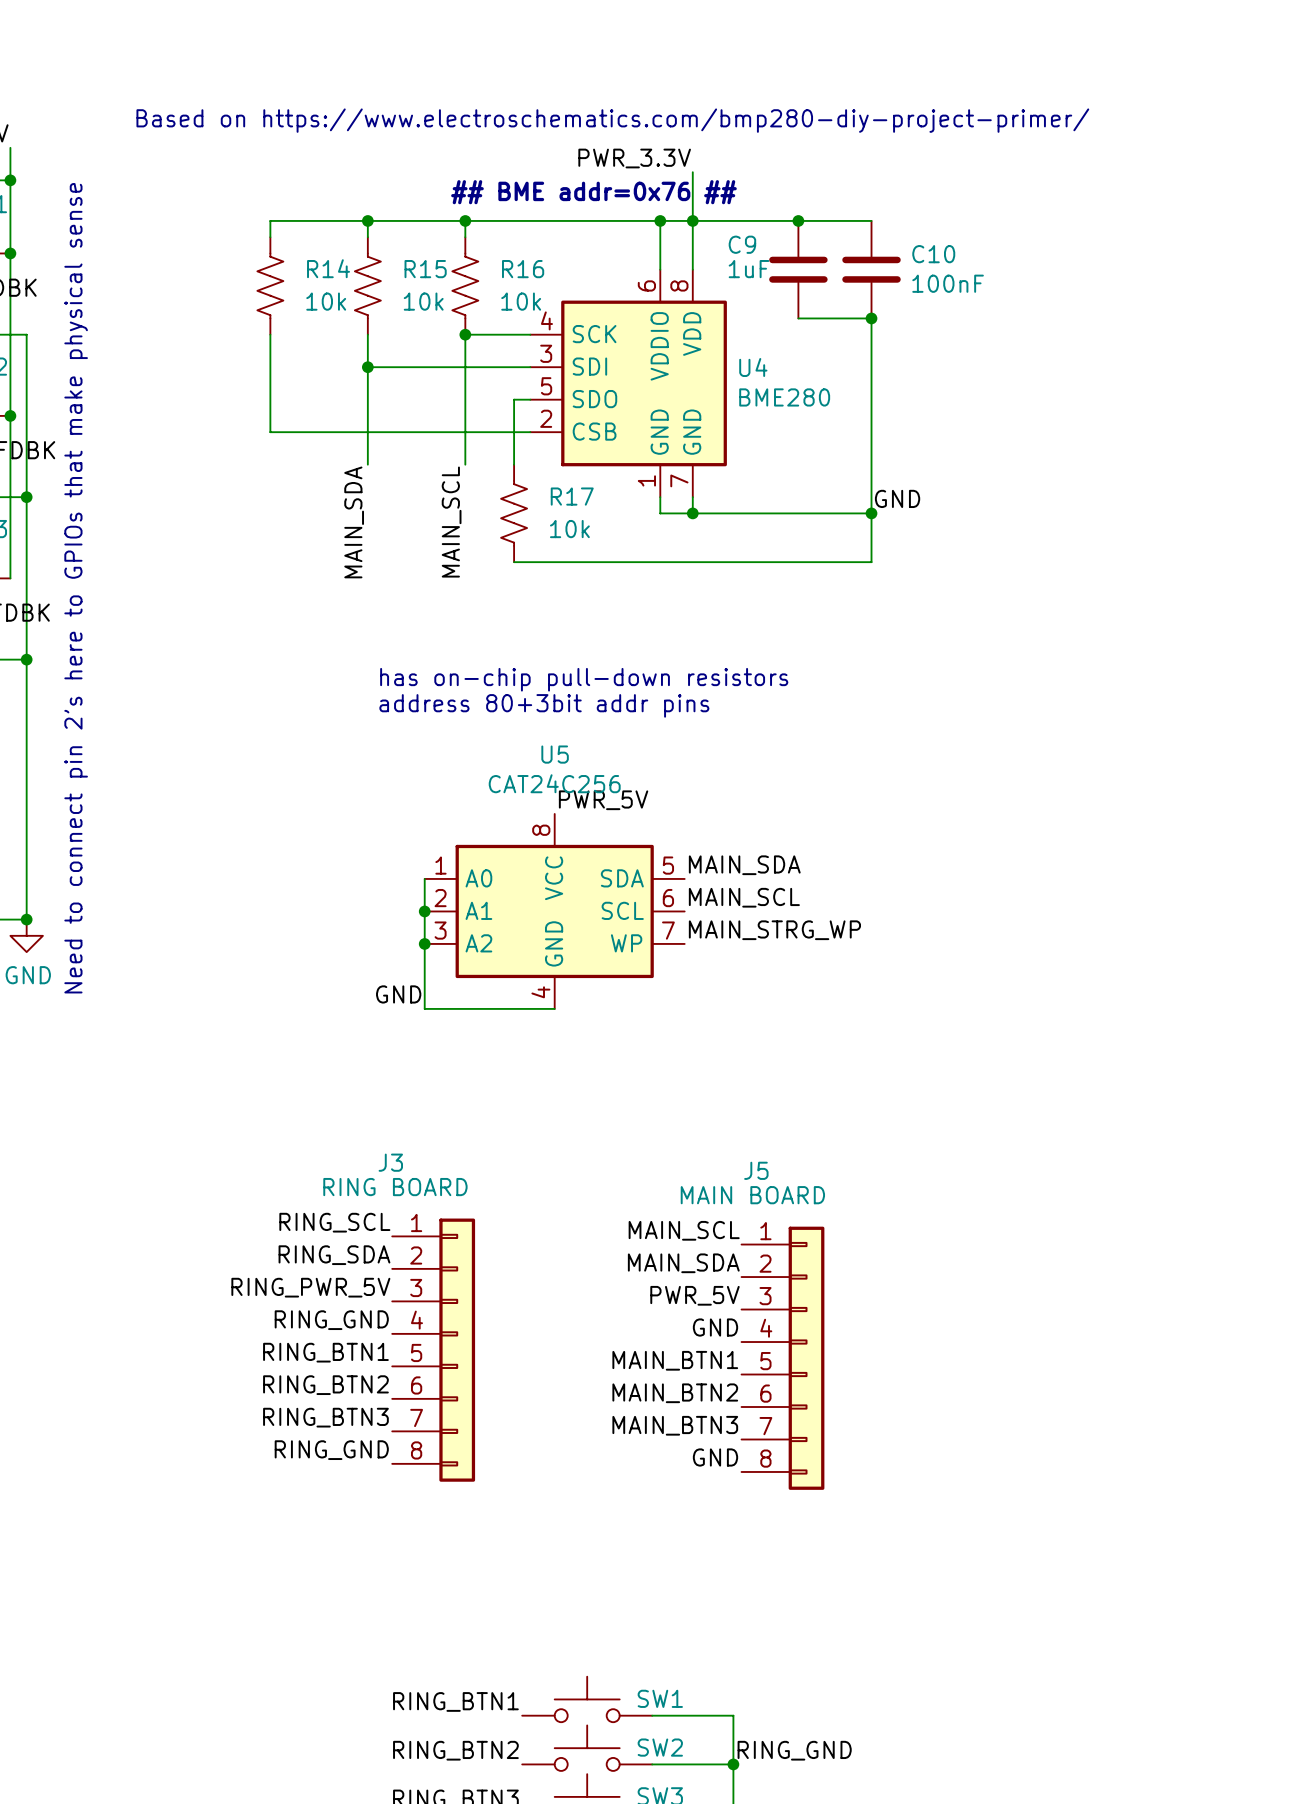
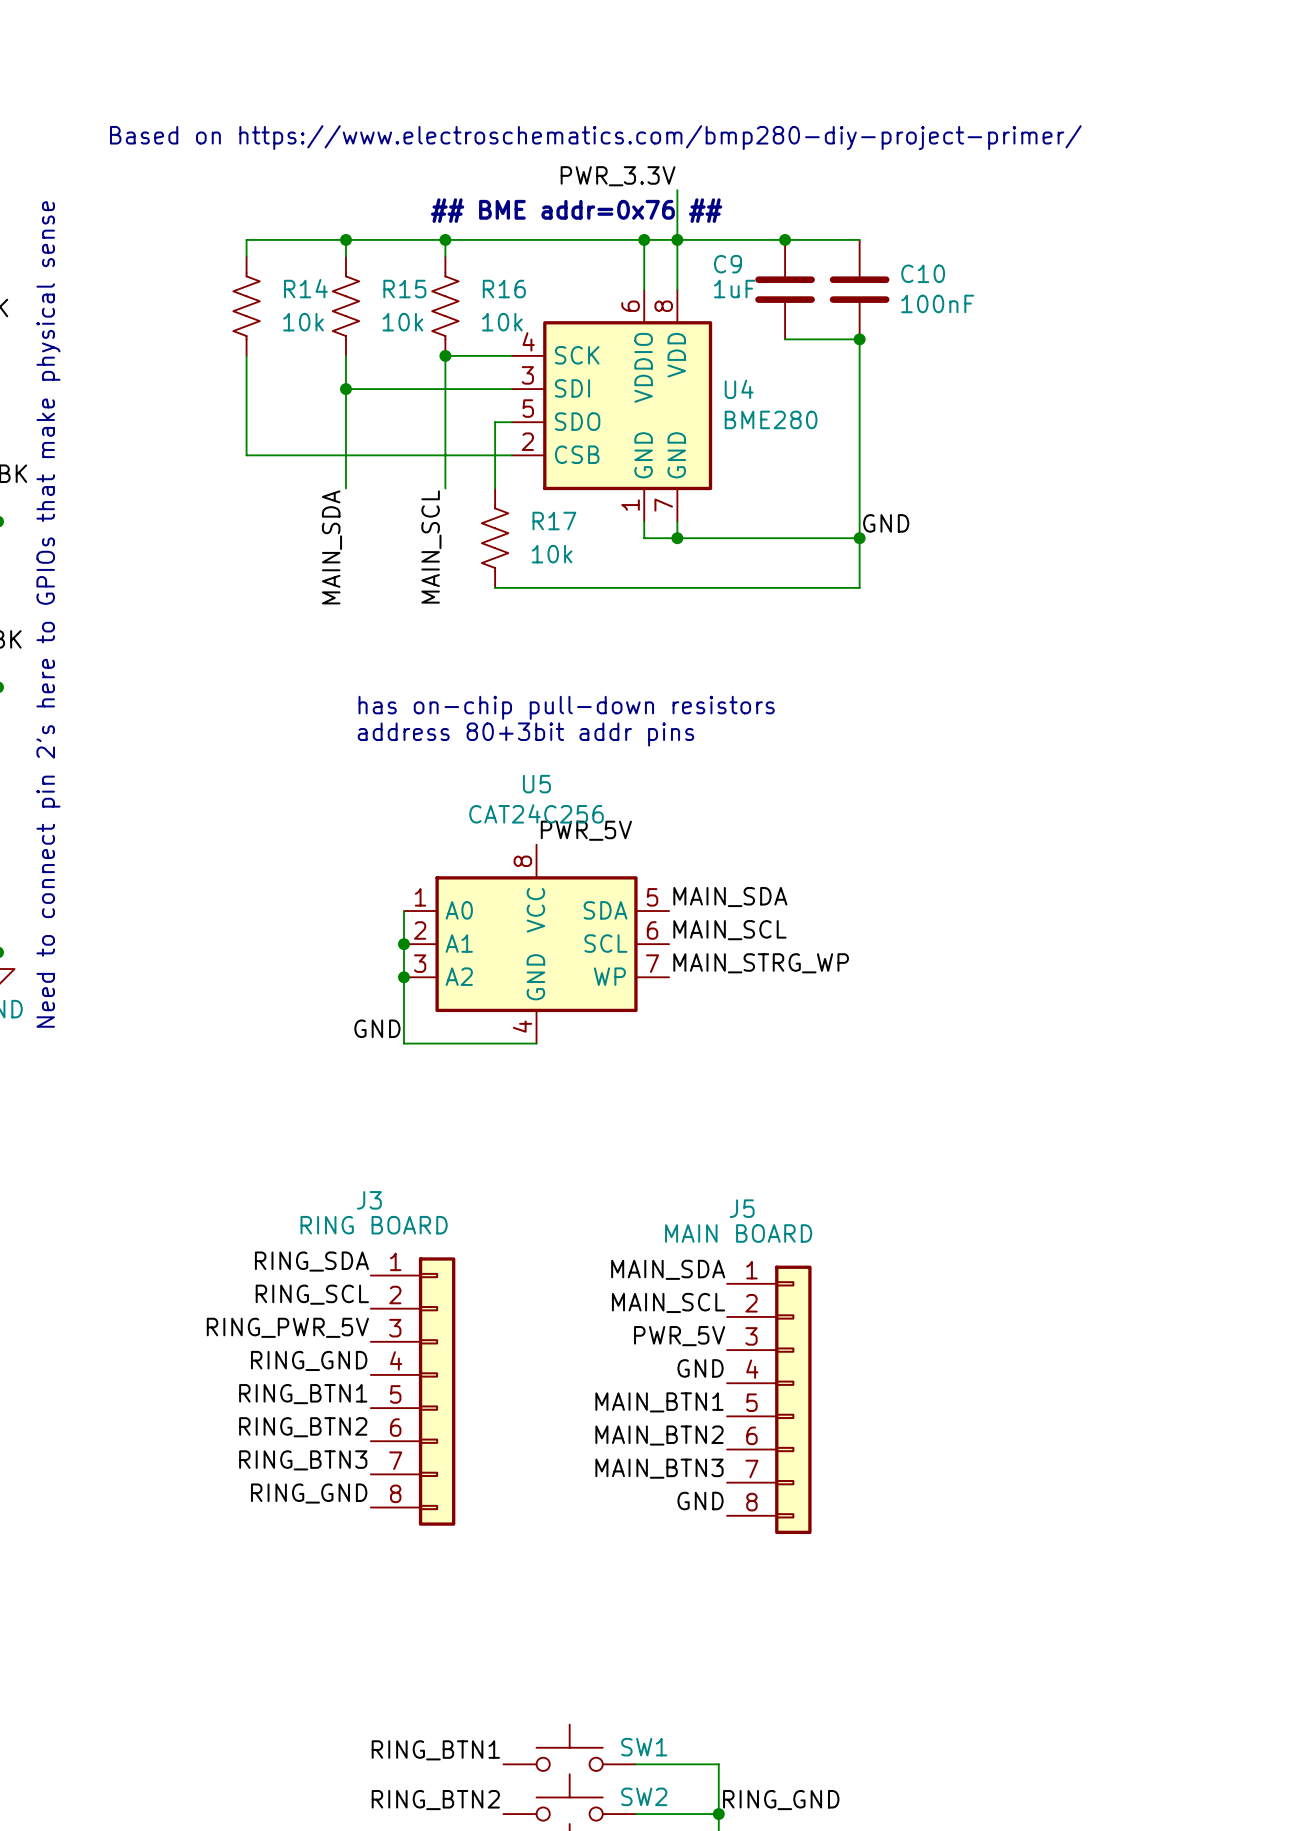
label: RING_SCL (334, 1222) -> RING_SDA (311, 1261)
label: MAIN_SCL (684, 1230) -> MAIN_SDA (668, 1269)
label: RING_SDA (334, 1255) -> RING_SCL (312, 1294)
label: MAIN_SDA (683, 1263) -> MAIN_SCL (668, 1302)

